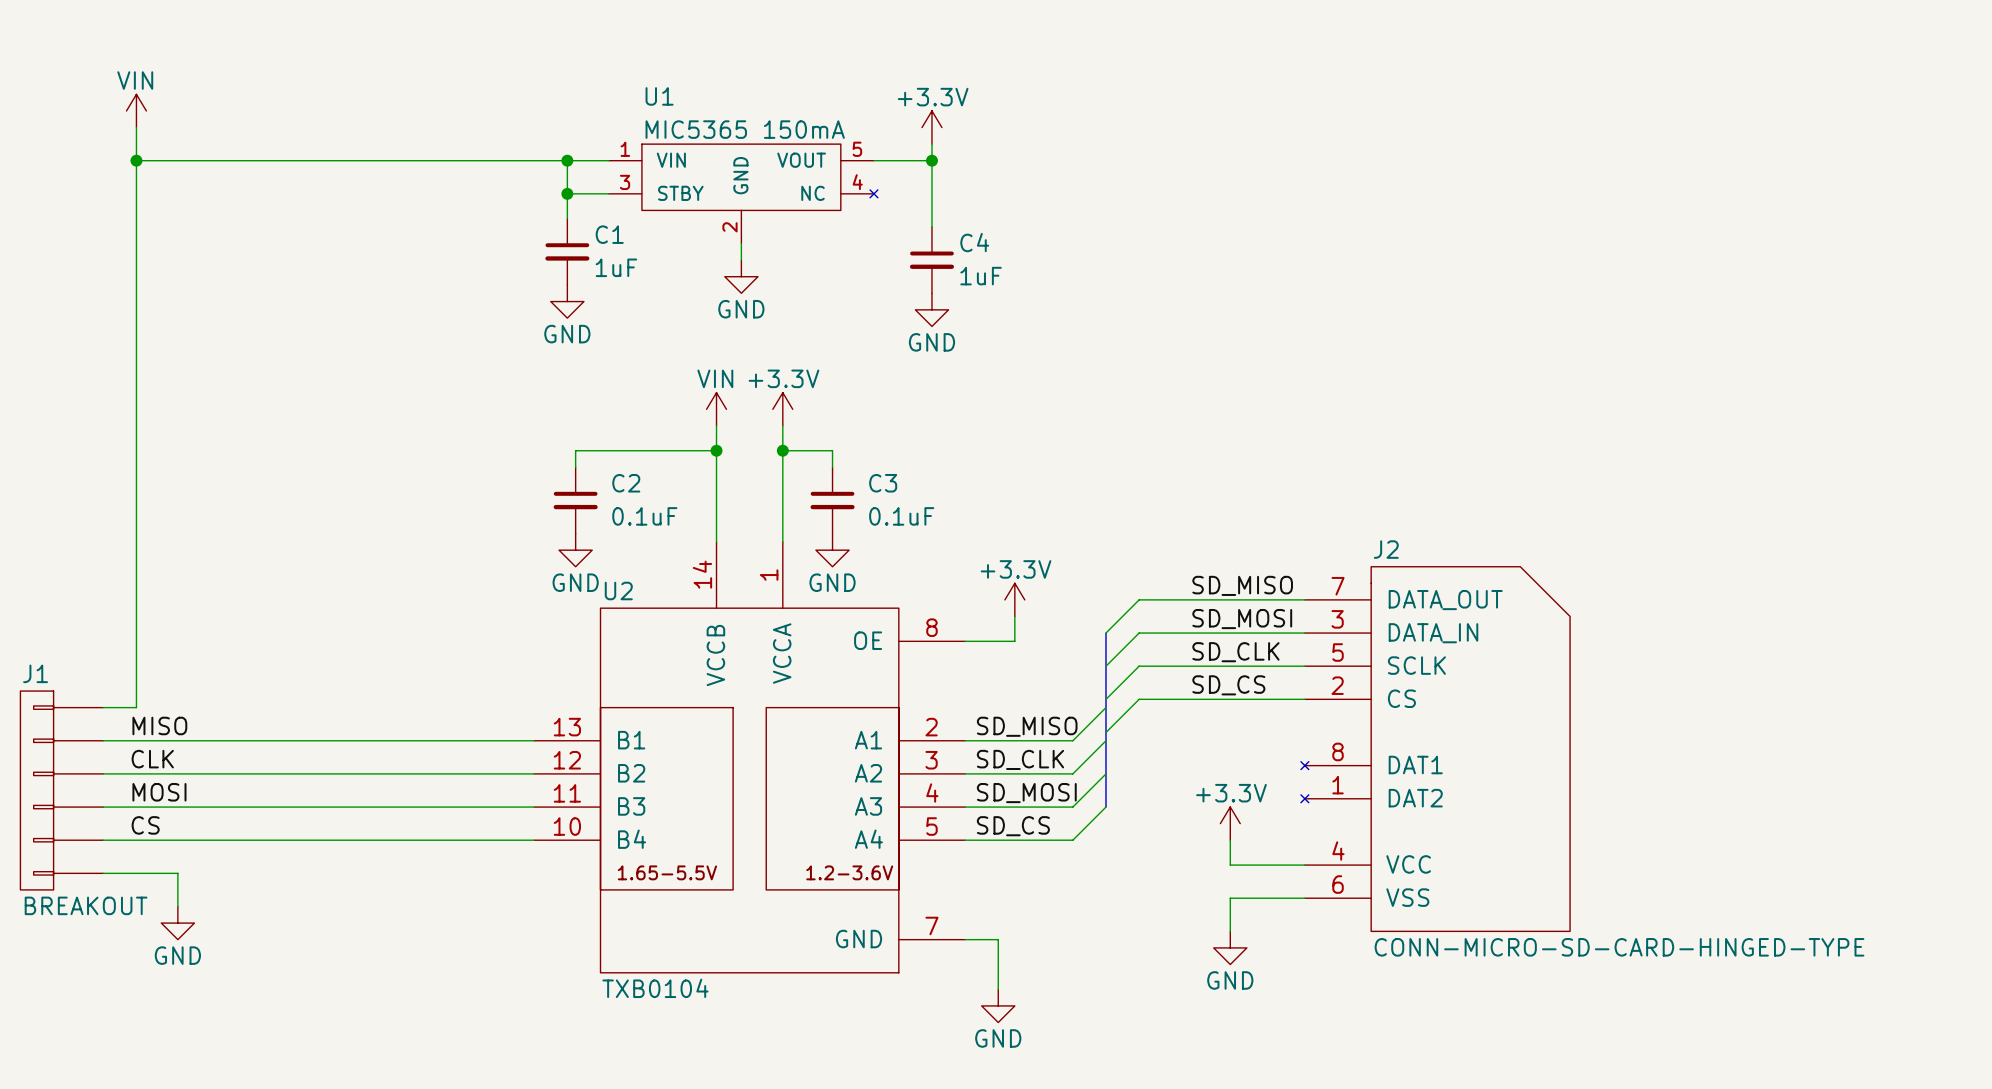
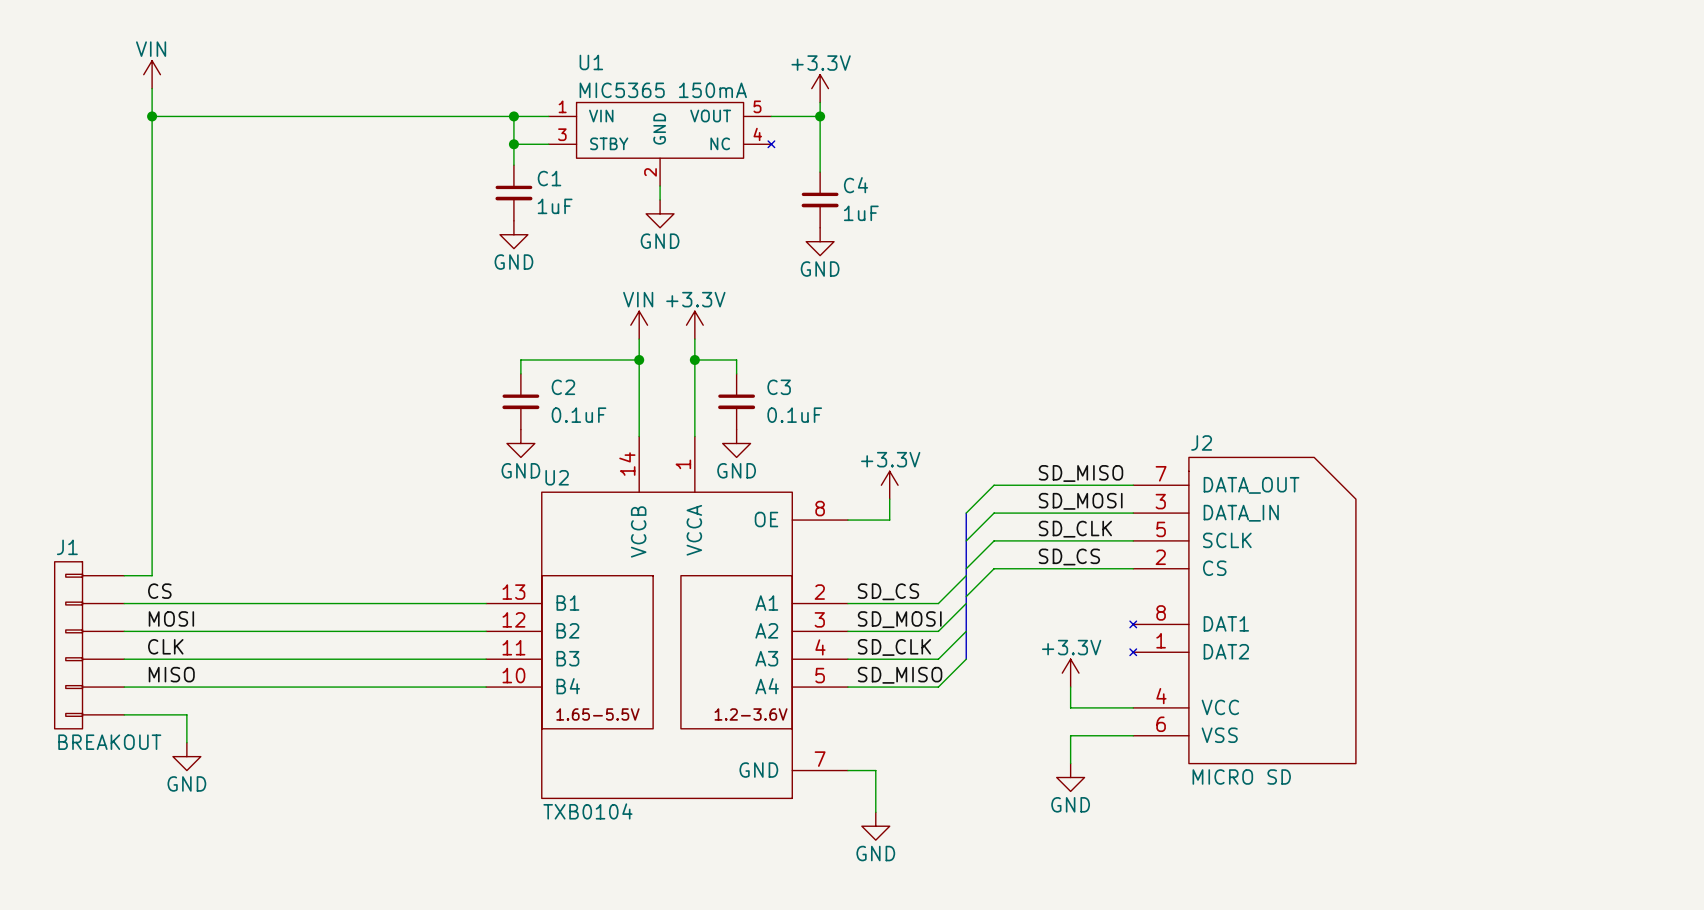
label: MISO (159, 725) -> CS (159, 591)
label: SD_MISO (1027, 726) -> SD_CS (888, 591)
label: CLK (152, 759) -> MOSI (171, 618)
label: SD_CLK (1020, 759) -> SD_MOSI (899, 619)
label: MOSI (159, 792) -> CLK (165, 646)
label: SD_MOSI (1026, 793) -> SD_CLK (894, 647)
label: CS (145, 825) -> MISO (171, 674)
label: SD_CS (1013, 826) -> SD_MISO (900, 675)
J2 value: CONN-MICRO-SD-CARD-HINGED-TYPE (1619, 947) -> MICRO SD (1241, 776)

